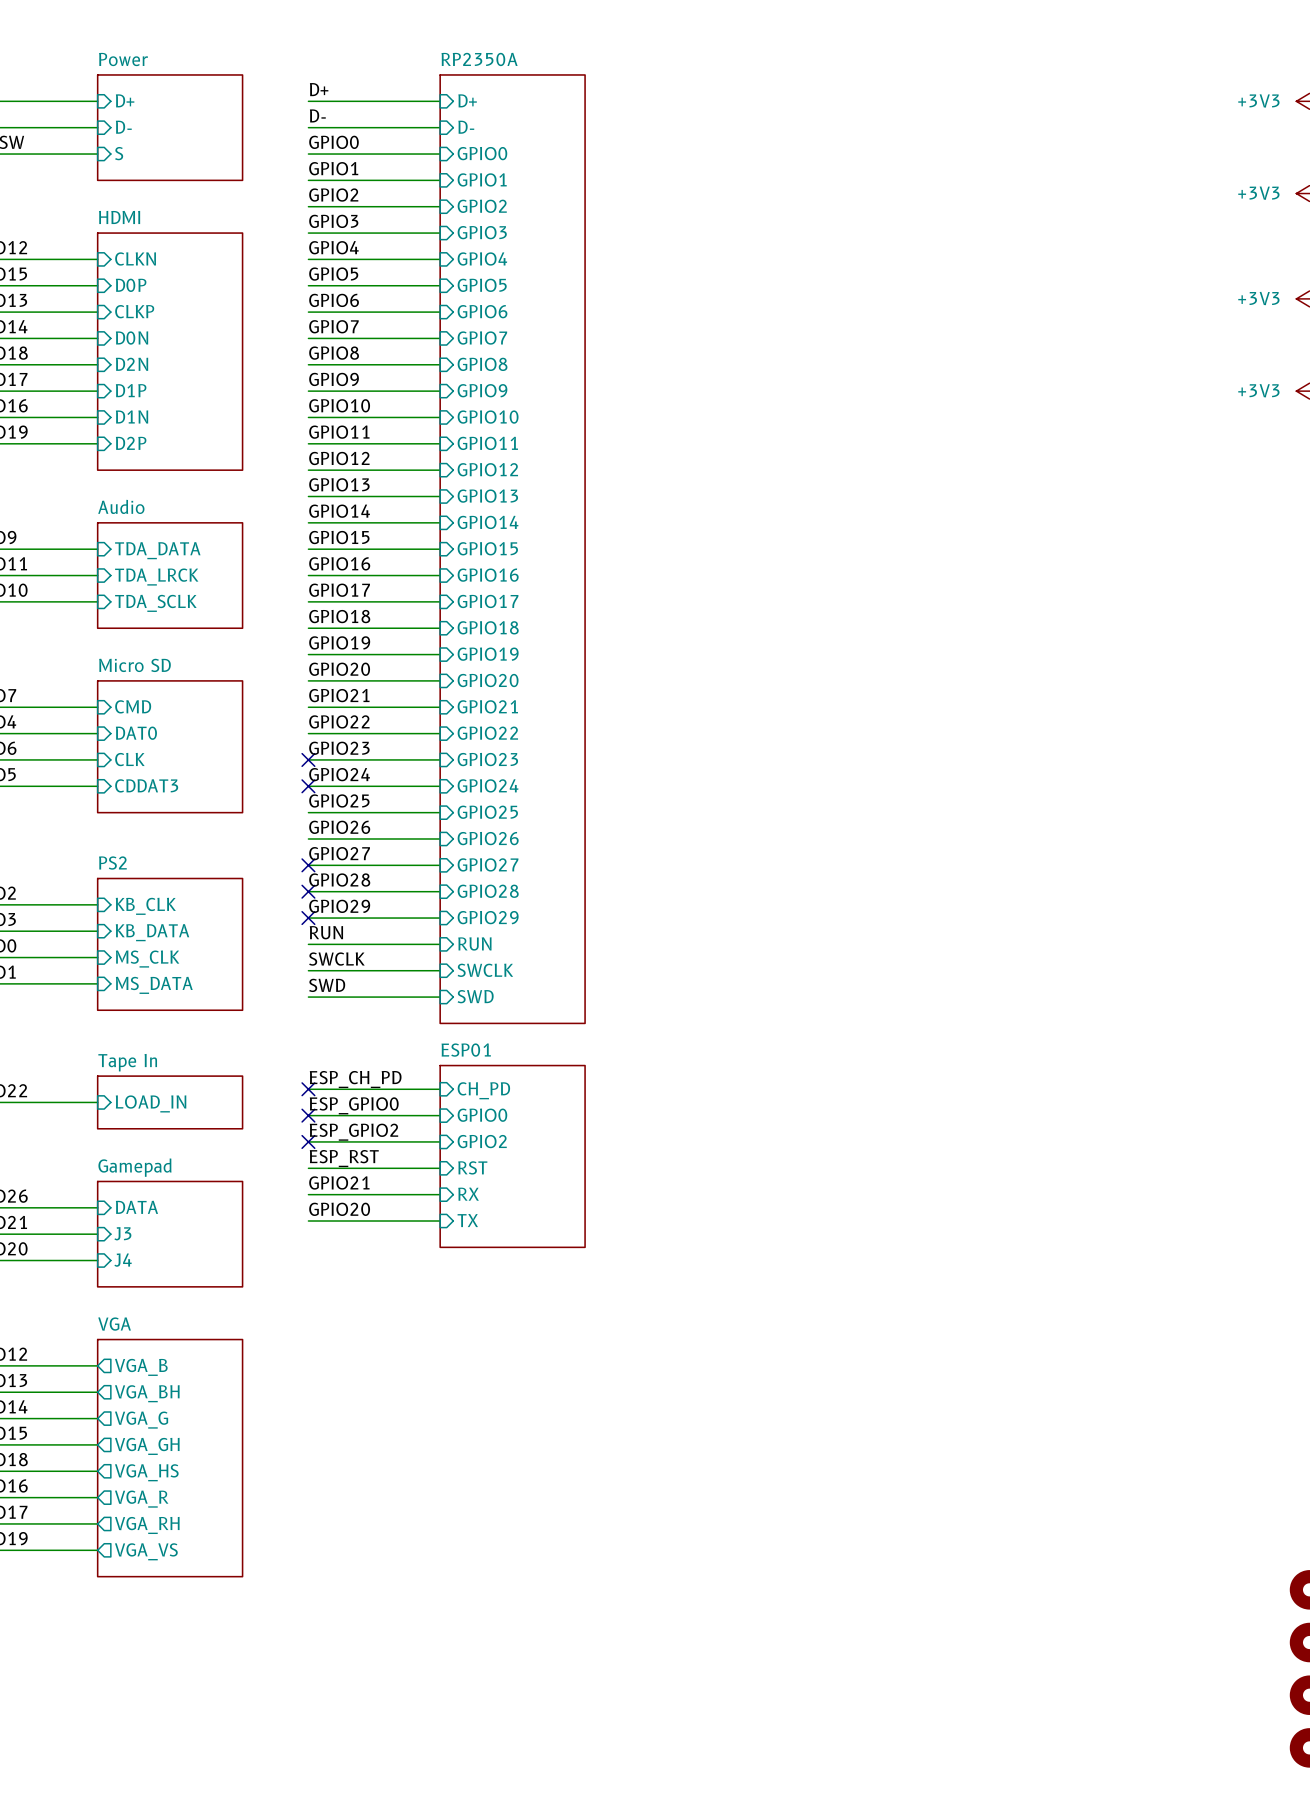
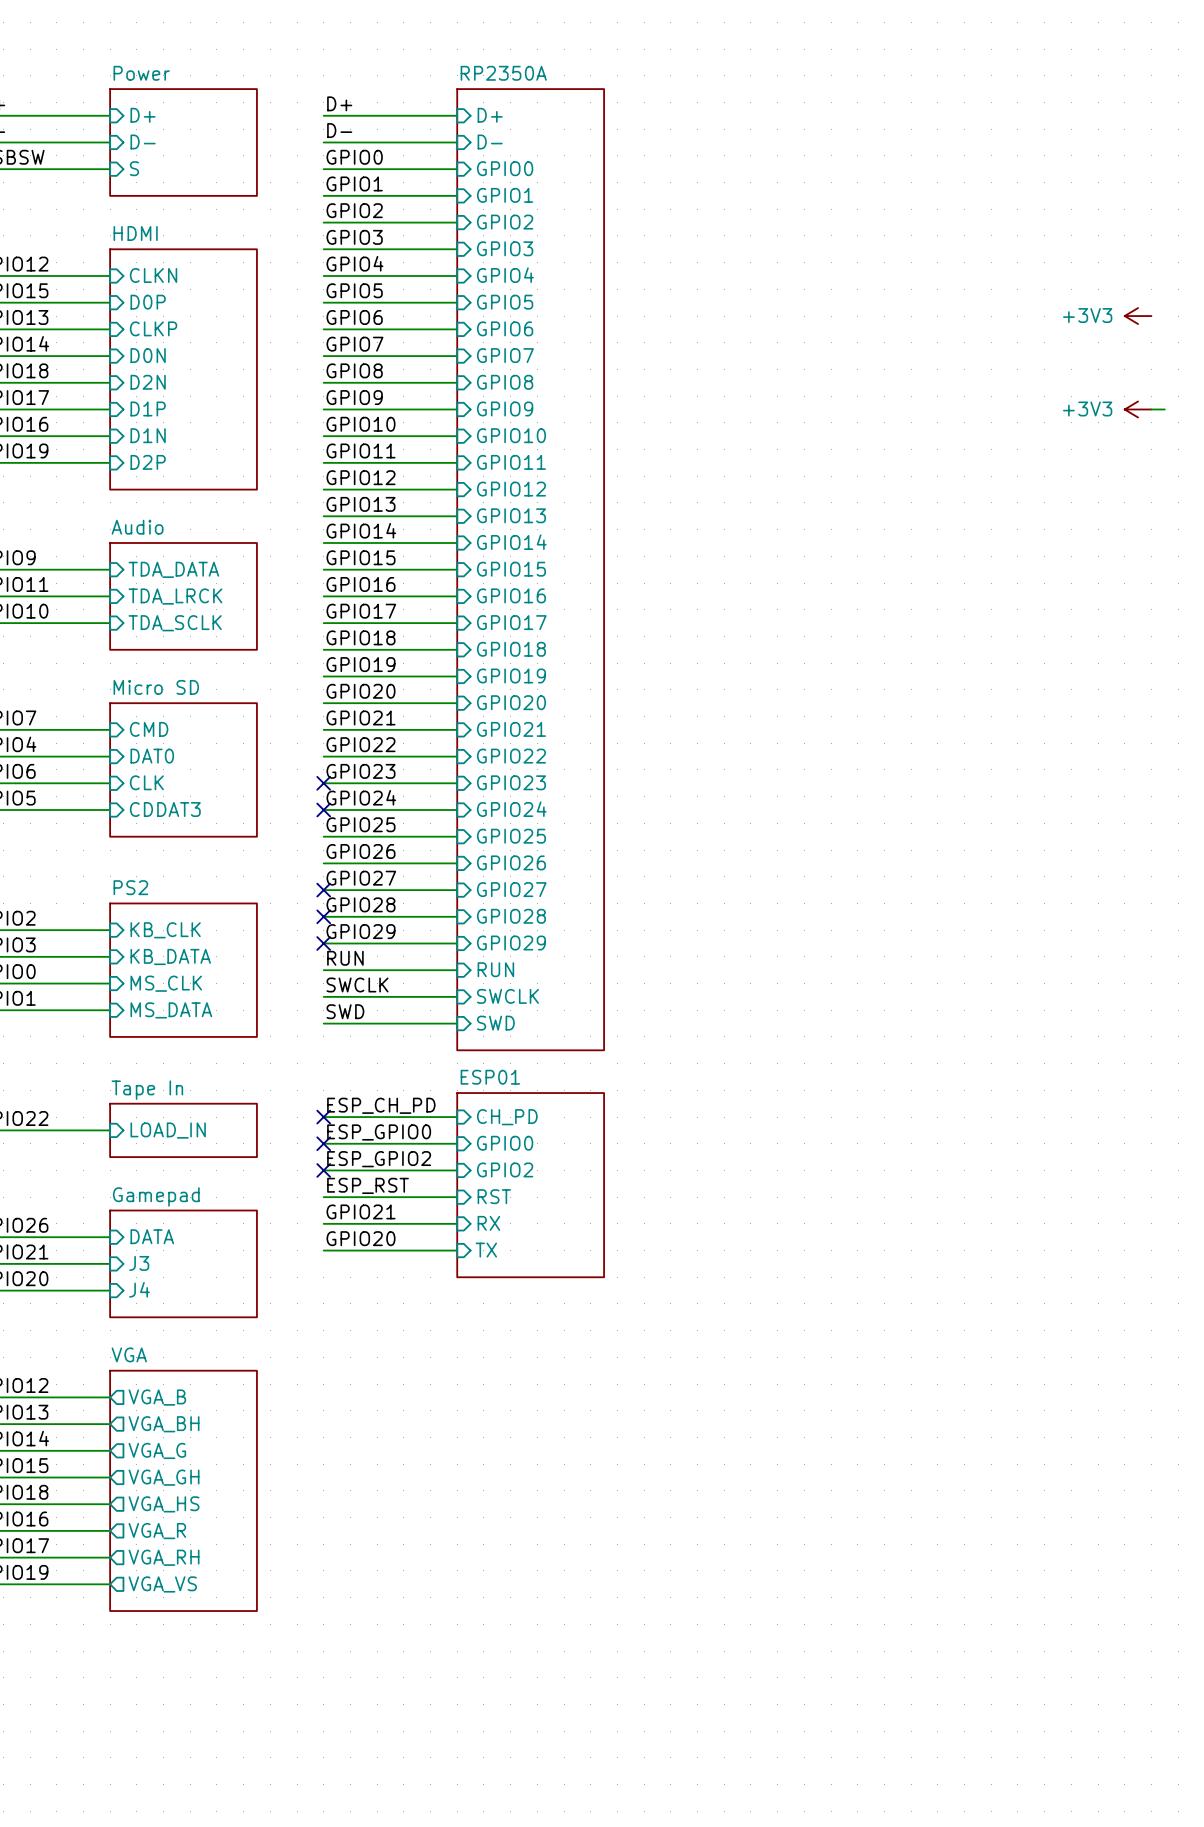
power symbol: none -> +3V3 (1138, 316)
power symbol: none -> +3V3 (1138, 409)
wire: none -> (1151, 409) (1164, 409)

